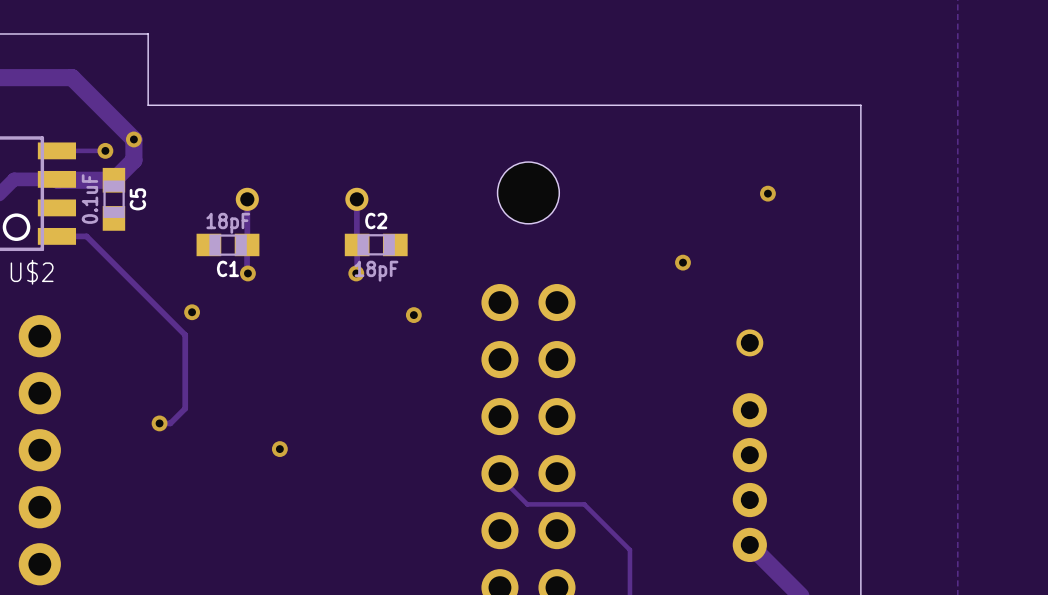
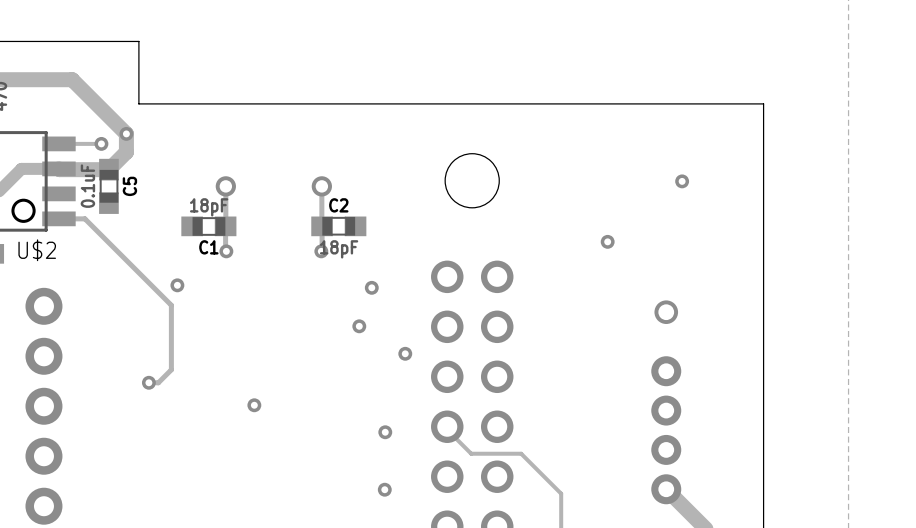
via: none -> (359, 326)
via: none -> (405, 353)
via: none -> (385, 432)
via: none -> (384, 489)

